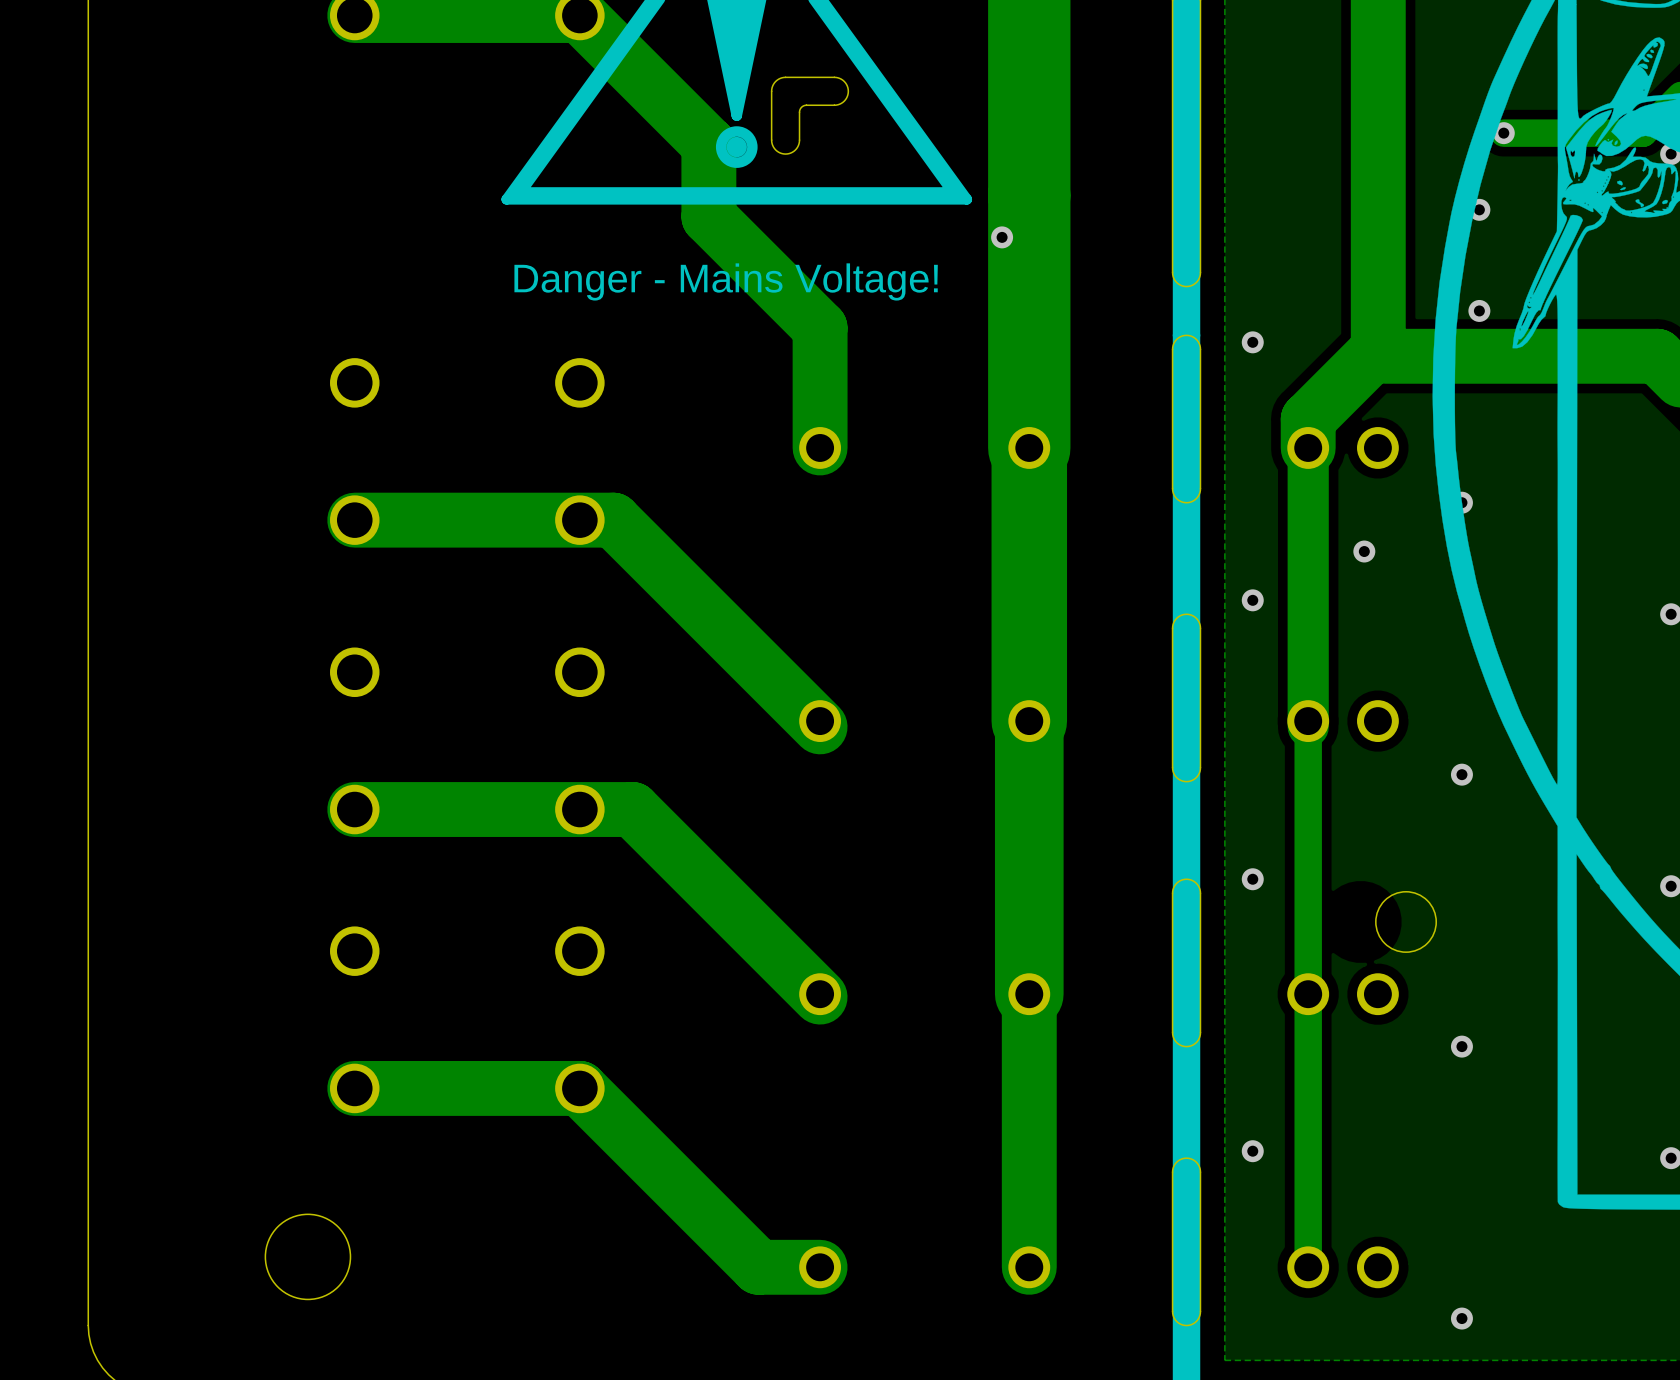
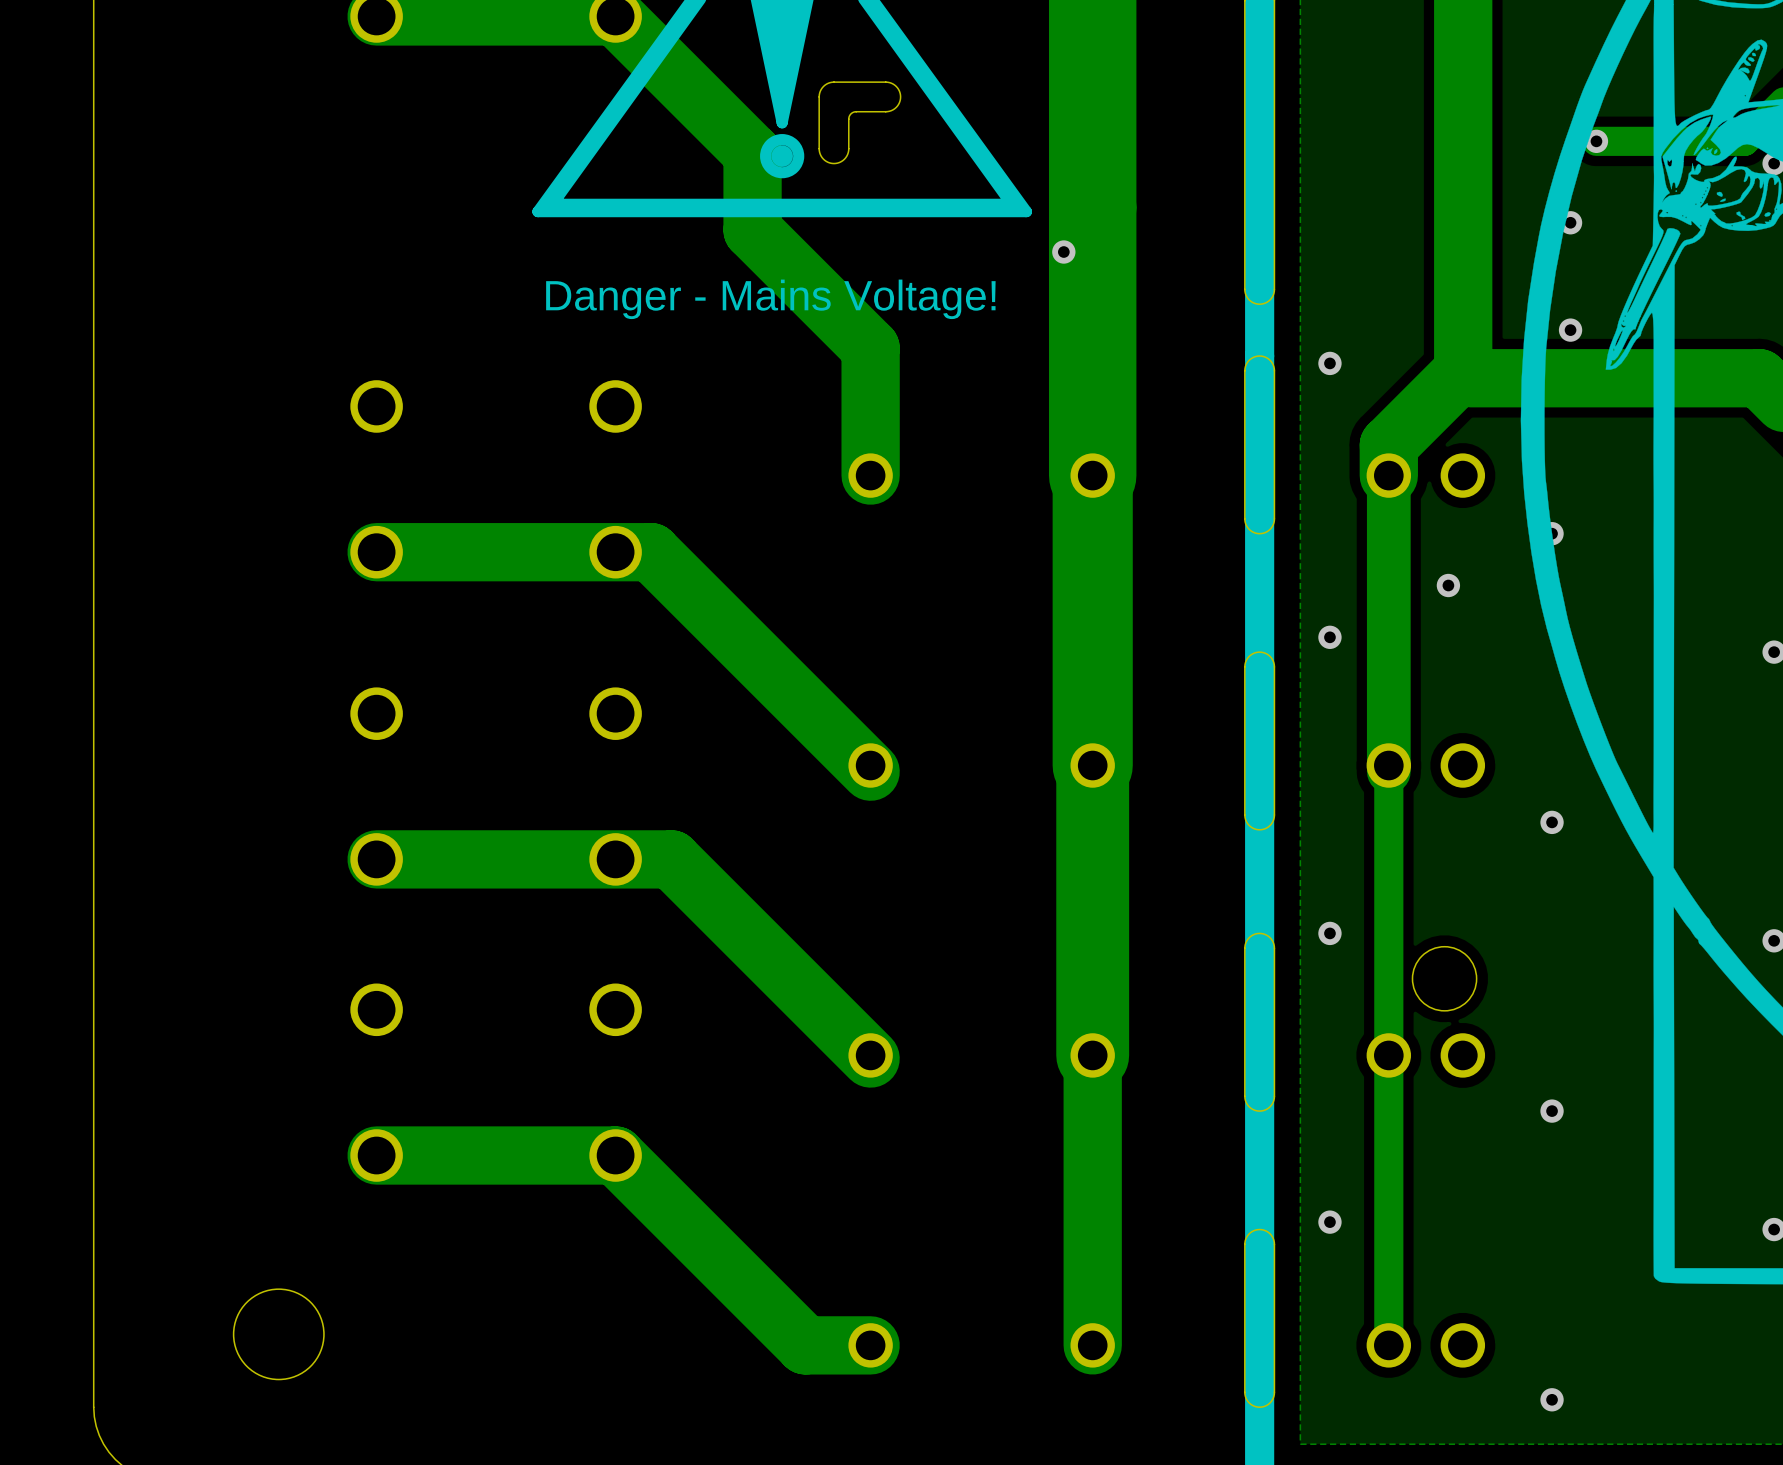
round board edge position: (1406, 921) -> (1444, 978)
round board edge position: (307, 1256) -> (278, 1334)

